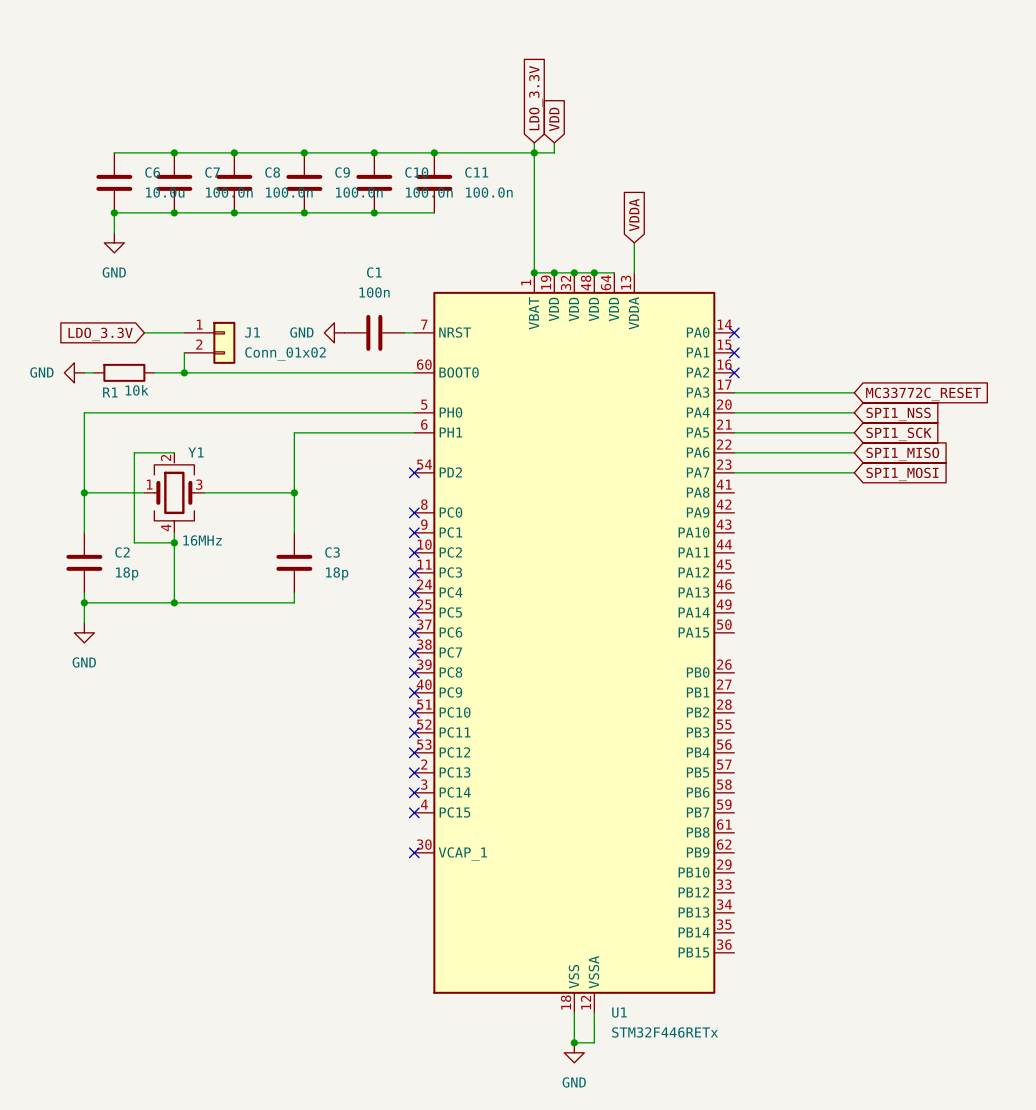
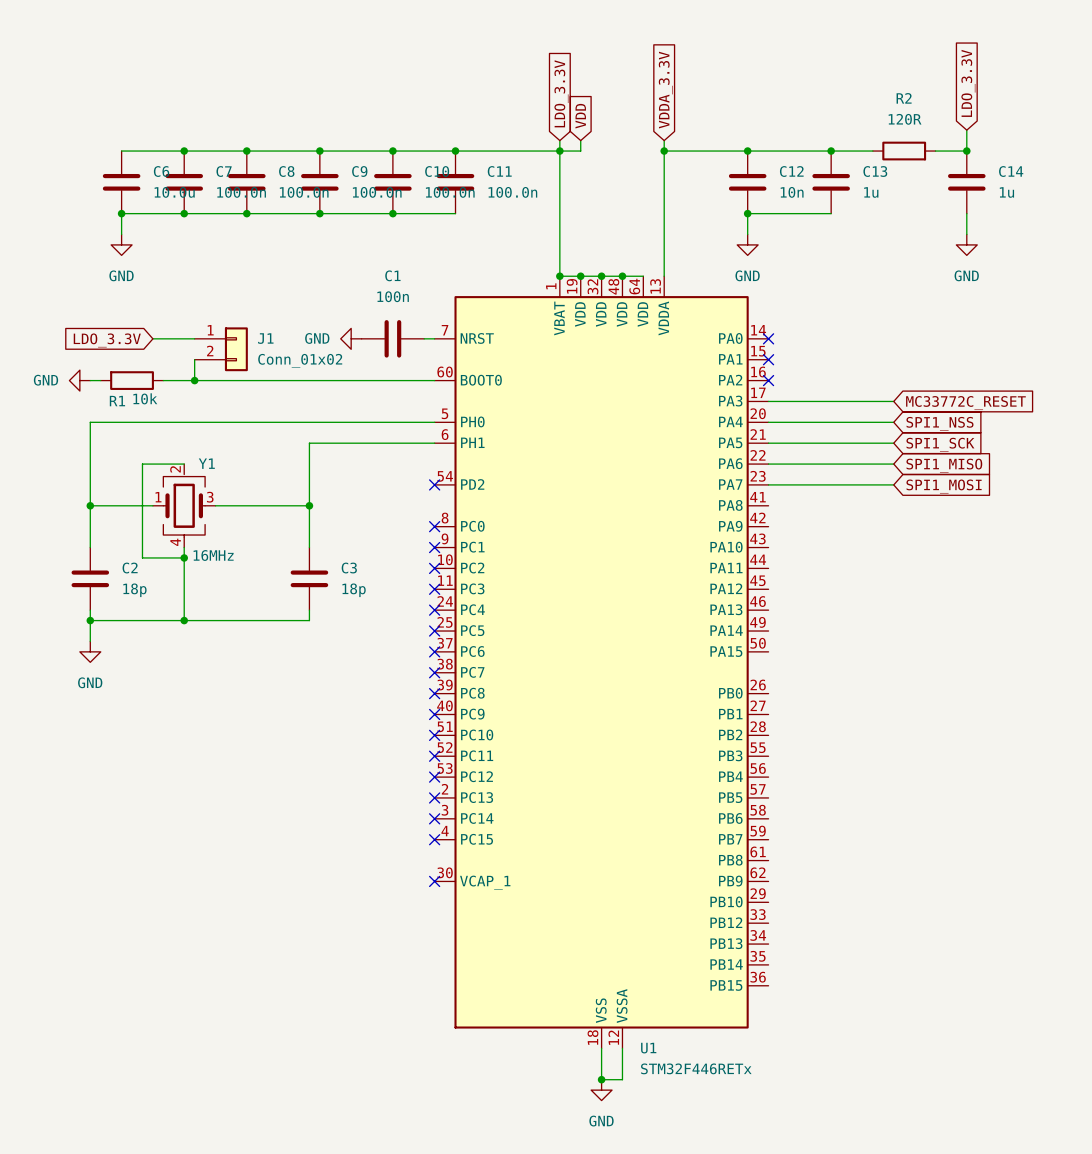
global label: none -> LDO_3.3V (968, 83)
global label: none -> VDDA_3.3V (665, 90)
wire: none -> (966, 130) (966, 151) (935, 151)
wire: none -> (664, 140) (664, 244)
wire: none -> (664, 151) (872, 151)
junction: none -> (664, 151)
junction: none -> (747, 151)
junction: none -> (831, 151)
R2: none -> 120R (904, 151)
junction: none -> (966, 151)
C12: none -> 10n (747, 182)
C13: none -> 1u (831, 182)
C14: none -> 1u (966, 182)
junction: none -> (747, 213)
wire: none -> (831, 213) (747, 213) (747, 234)
wire: none -> (966, 213) (966, 234)
global label: VDDA (634, 215) -> none
power symbol: none -> GND (747, 244)
power symbol: none -> GND (966, 244)

